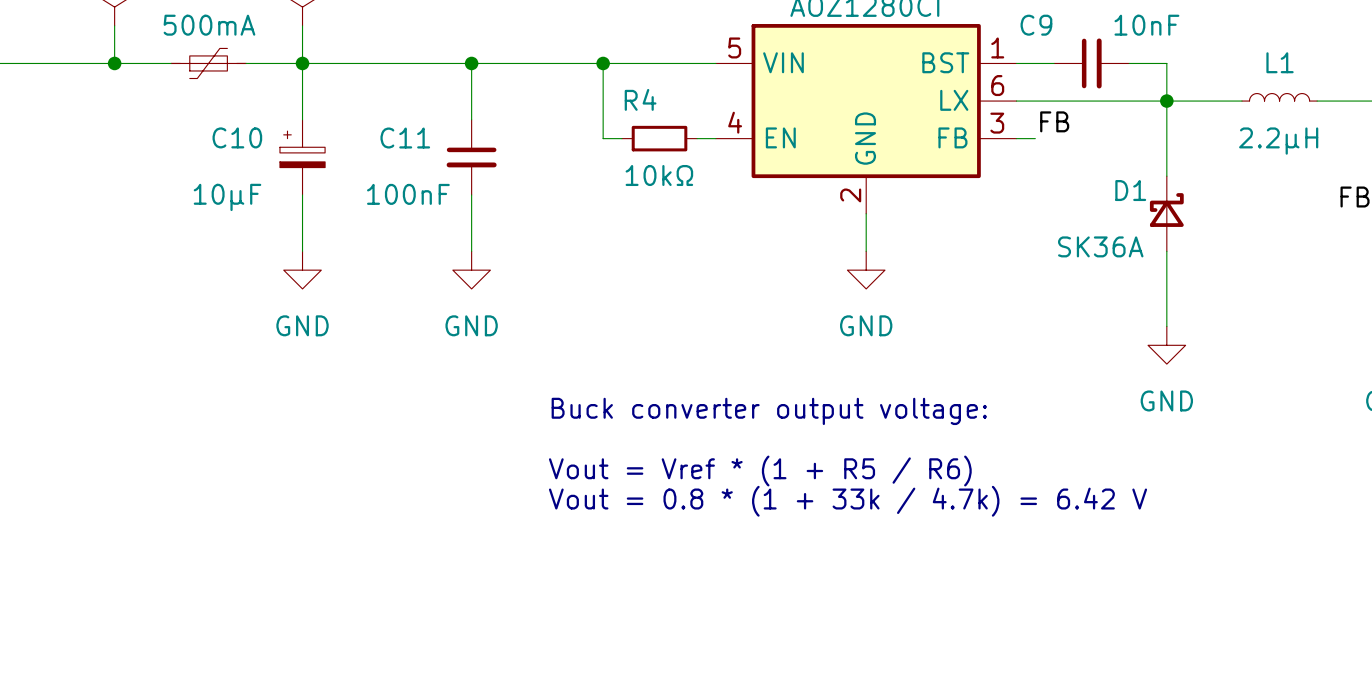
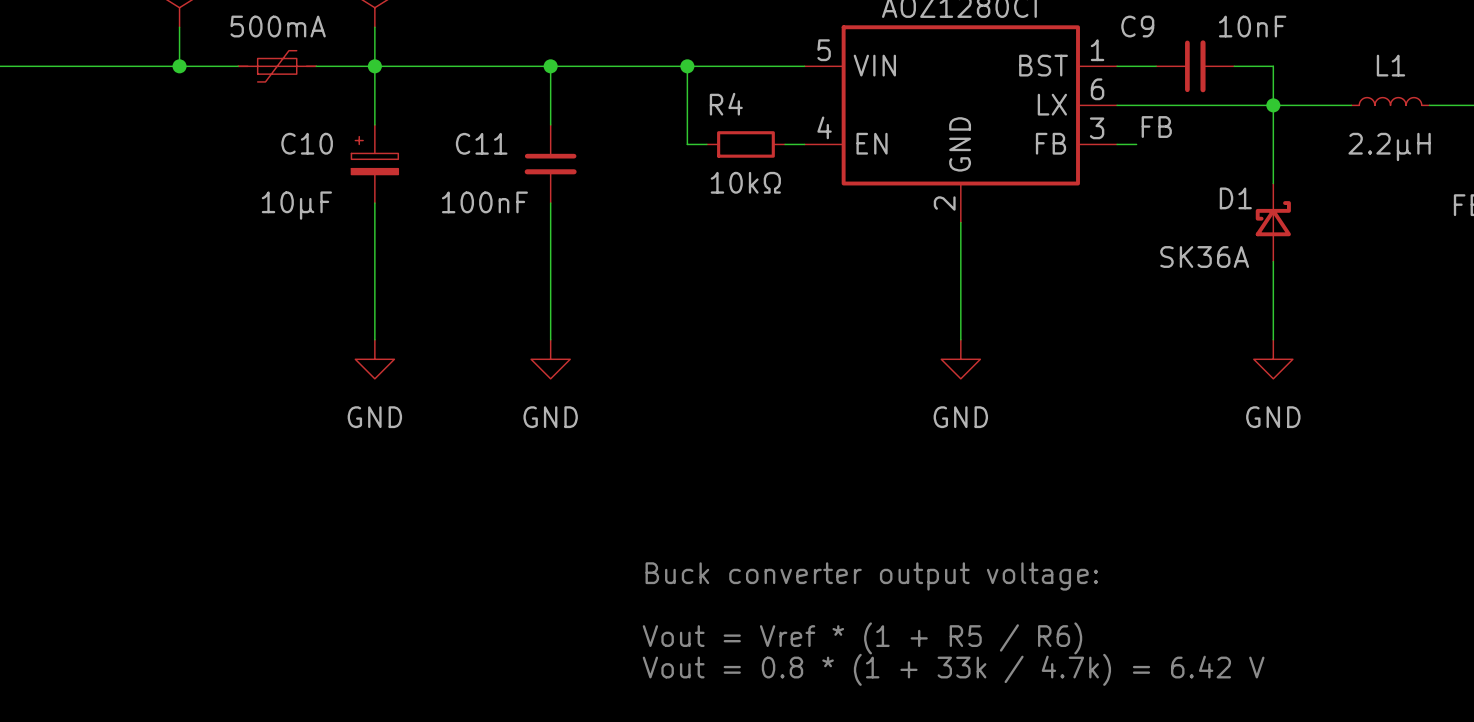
wire: none -> (374, 261) (374, 339)
wire: none -> (550, 261) (550, 339)
wire: none -> (960, 261) (960, 339)
power symbol position: GND (302, 270) -> GND (374, 359)
power symbol position: GND (471, 270) -> GND (550, 359)
power symbol position: GND (866, 270) -> GND (960, 359)
text position: Buck converter output voltage: (769, 411) -> Buck converter output voltage: (871, 576)
text position: Vout = Vref * (1 + R5 / R6) (760, 471) -> Vout = Vref * (1 + R5 / R6) (862, 638)
text position: Vout = 0.8 * (1 + 33k / 4.7k) = 6.42 V (848, 501) -> Vout = 0.8 * (1 + 33k / 4.7k) = 6.42 V (953, 669)

